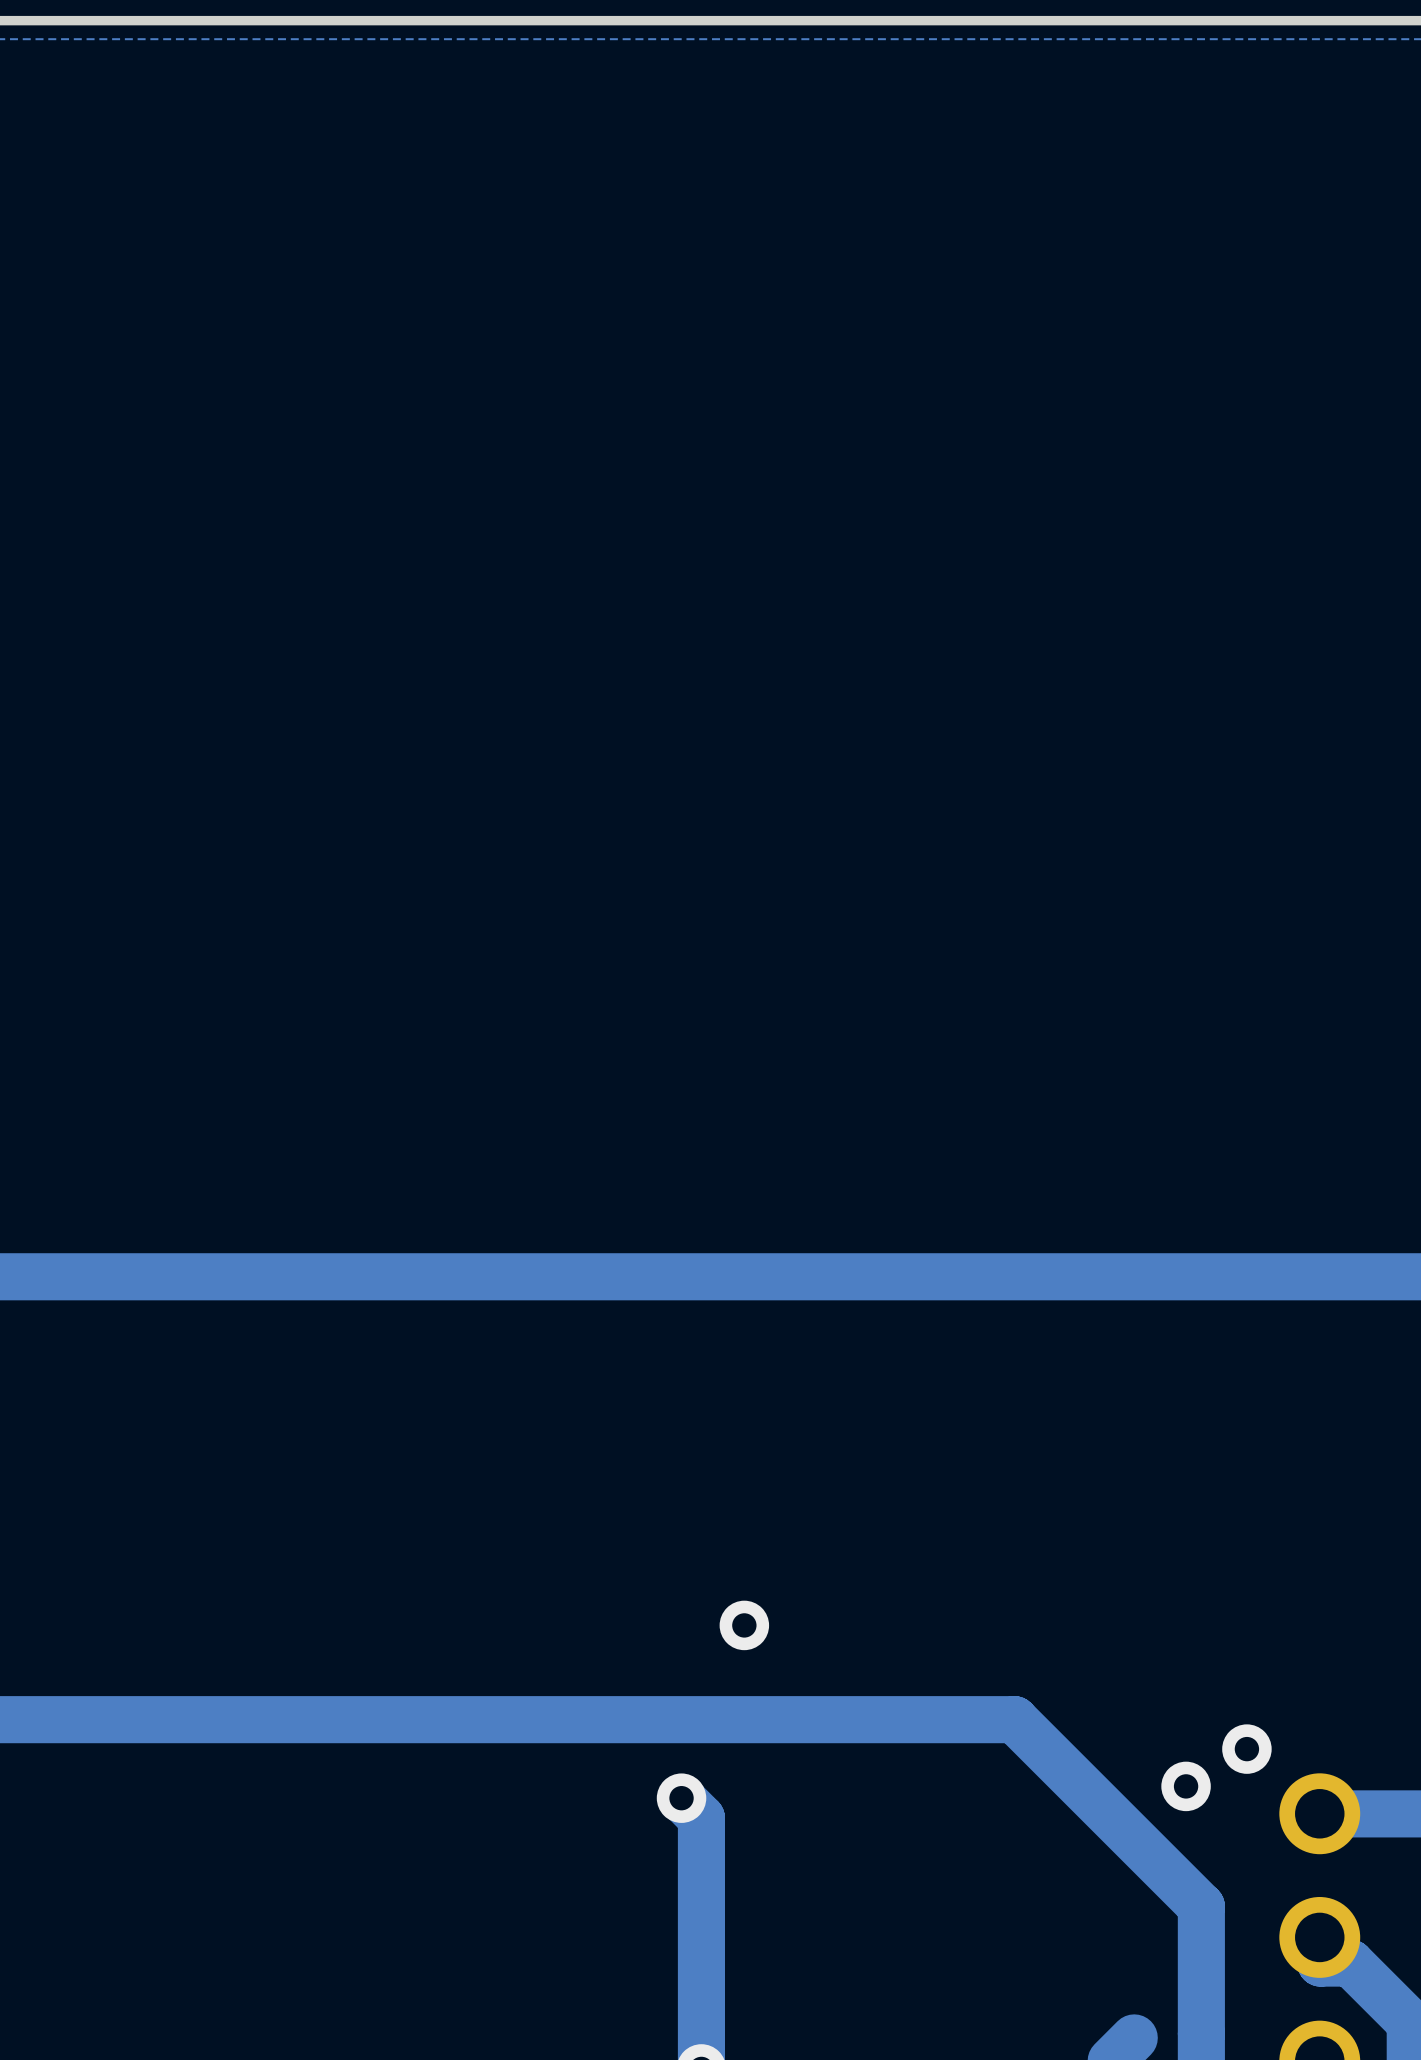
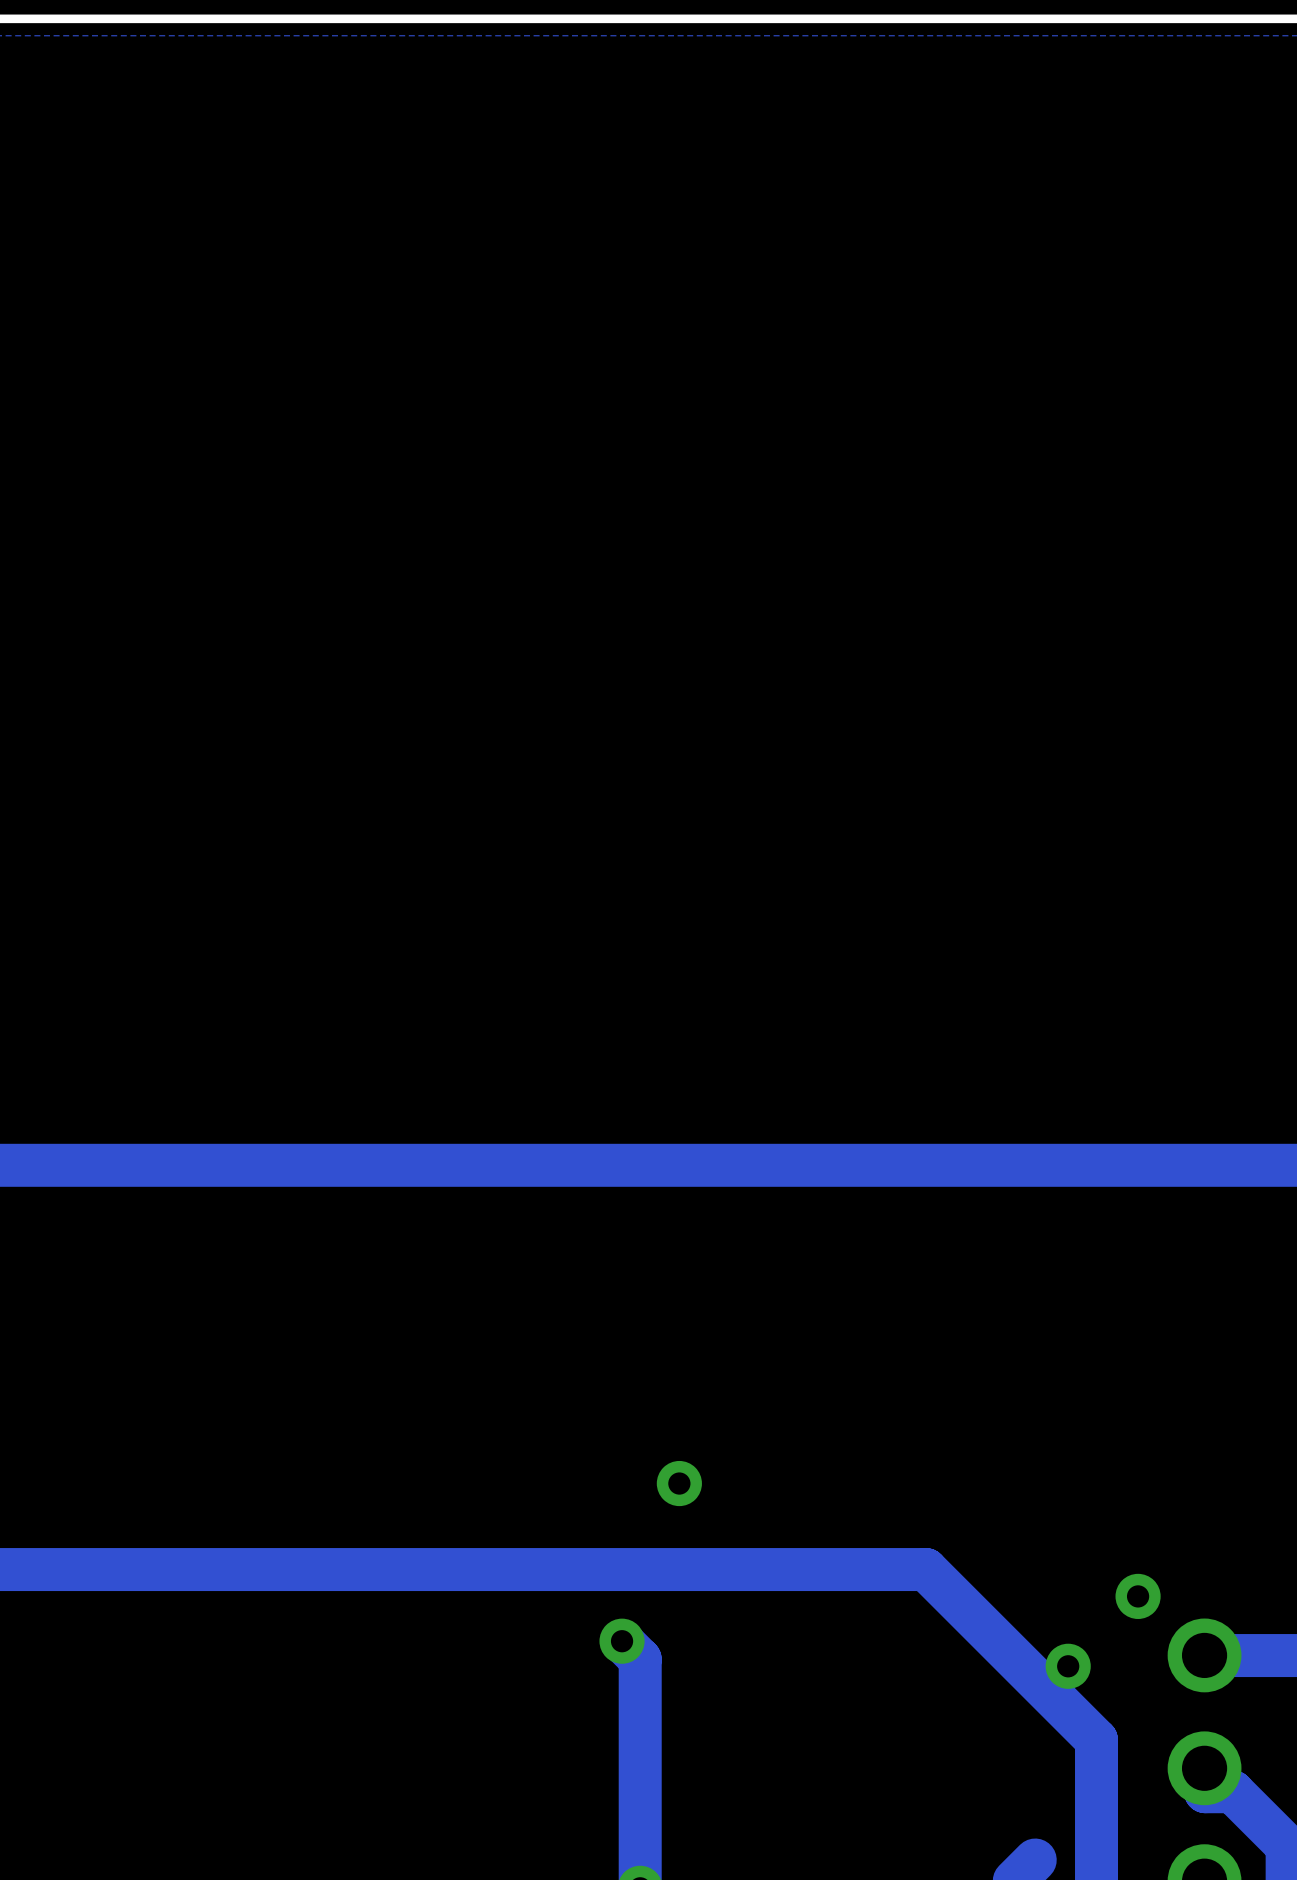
via position: (1186, 1786) -> (1068, 1666)

